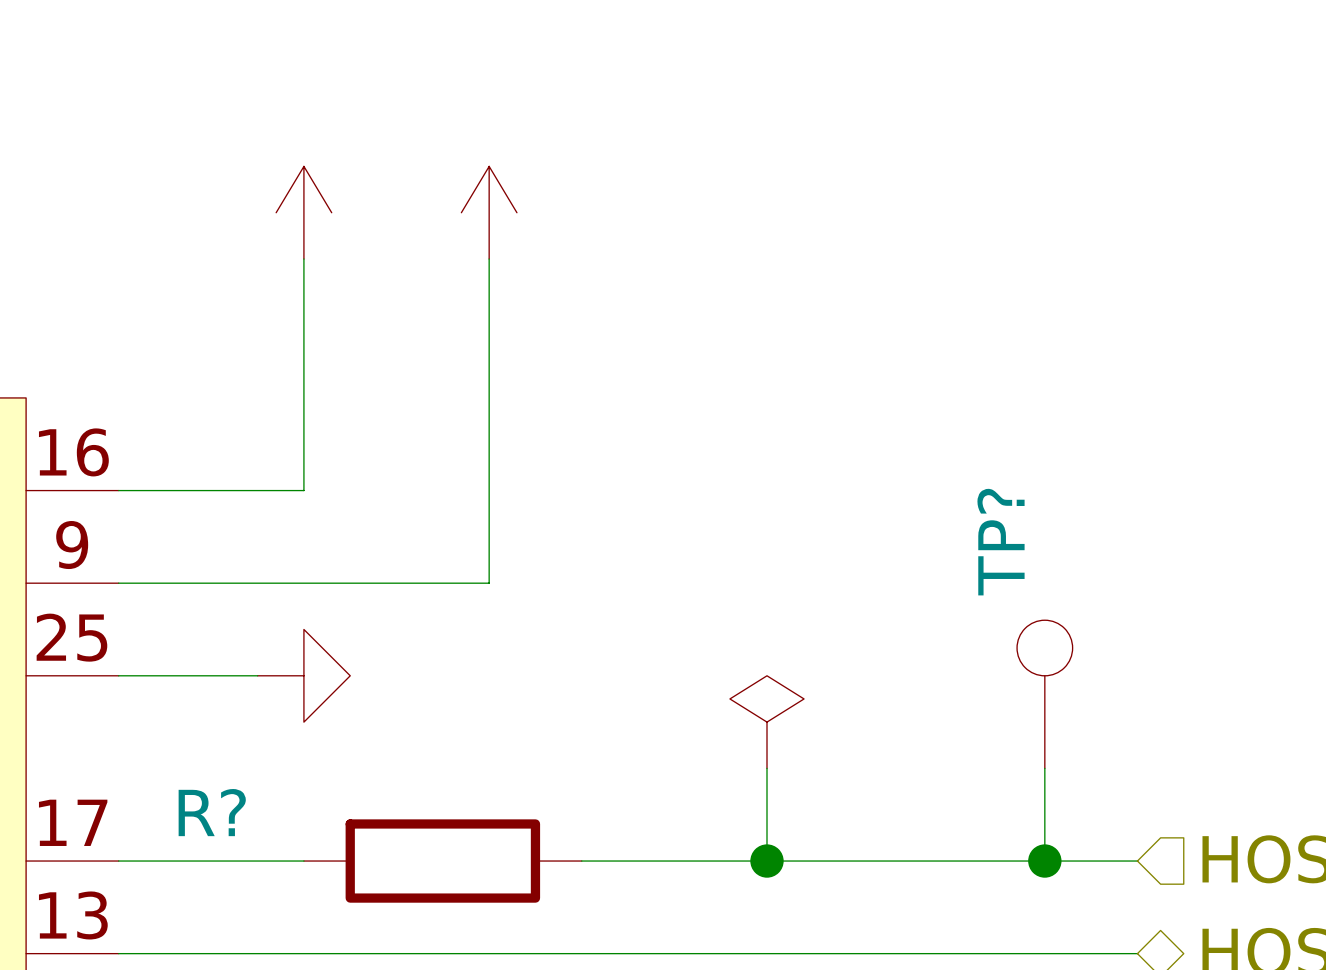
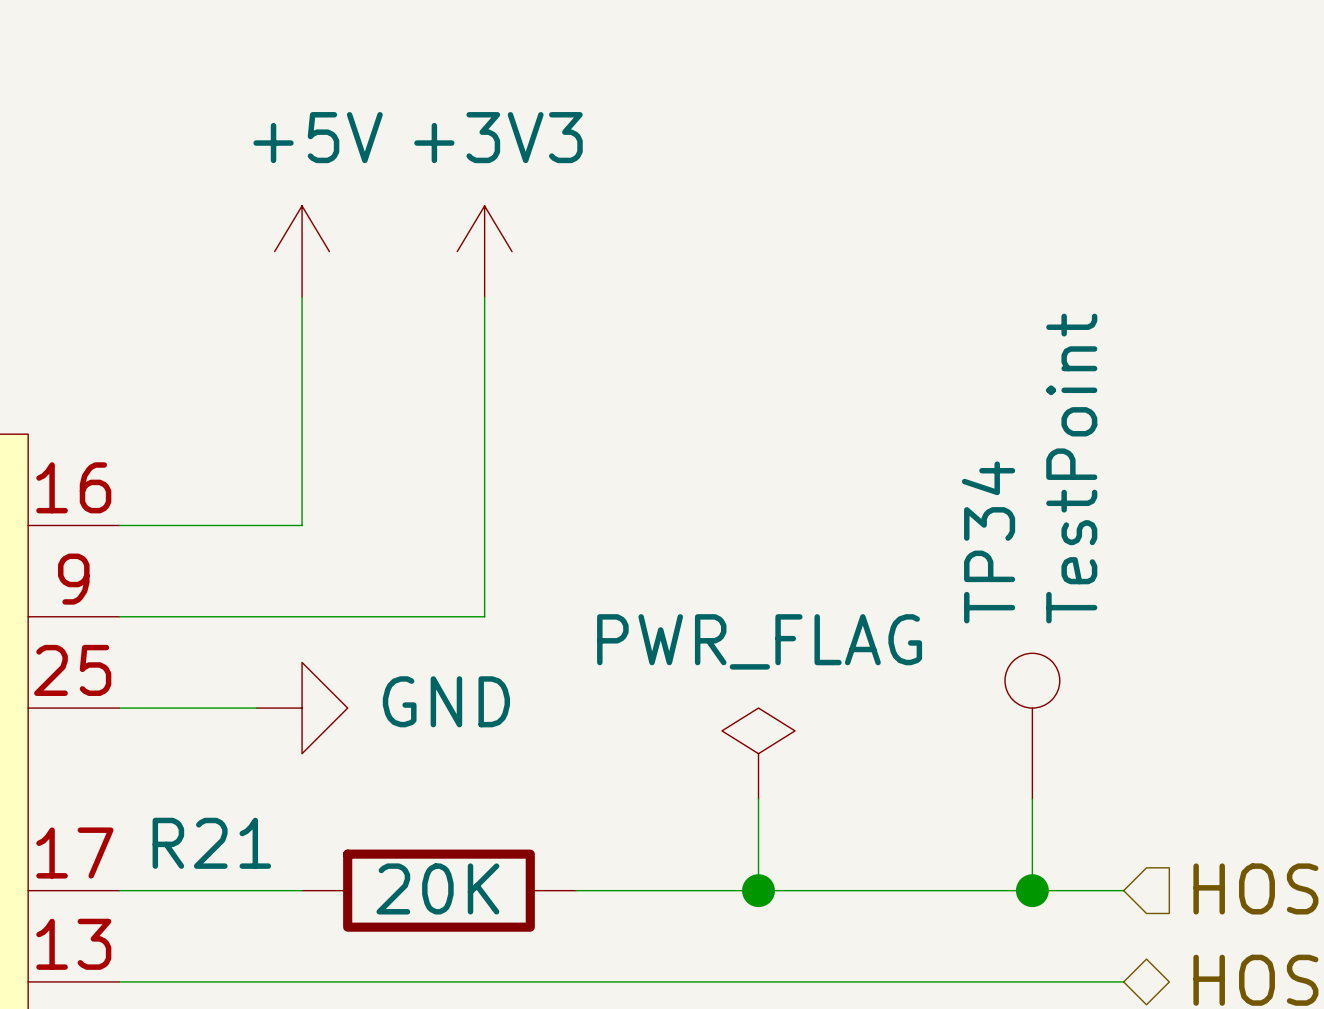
power symbol text: none -> +5V (318, 137)
power symbol text: none -> +3V3 (498, 137)
TP? value: none -> TestPoint (1071, 468)
TP? name: TP? (1001, 542) -> TP34 (988, 542)
power symbol text: none -> PWR_FLAG (759, 641)
power symbol text: none -> GND (446, 701)
R? name: R? (212, 812) -> R21 (211, 843)
R? value: none -> 20K (437, 888)

